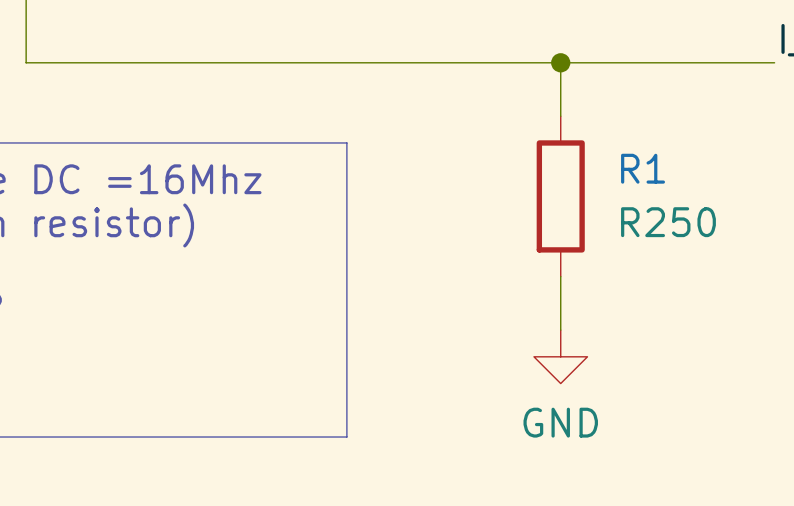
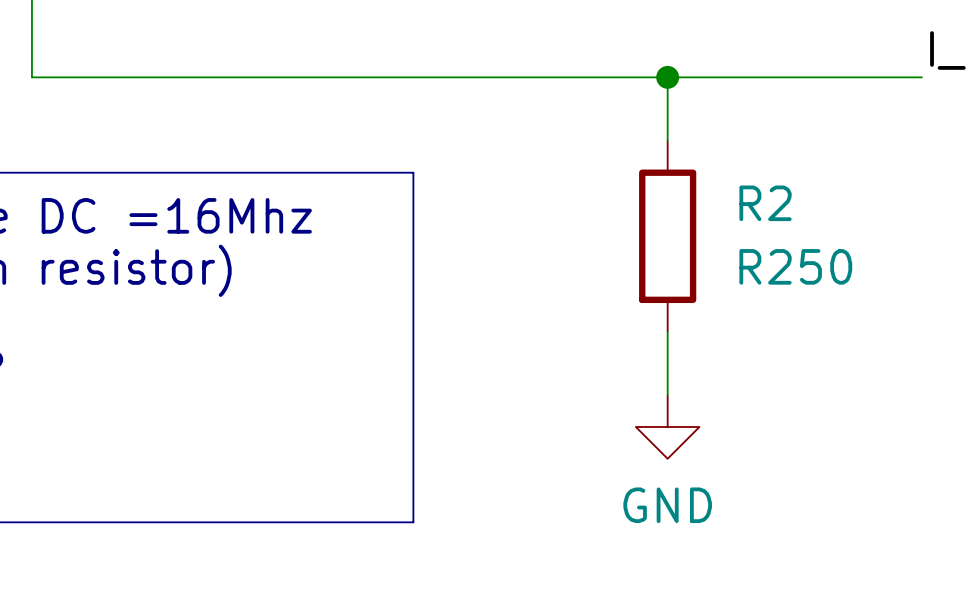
R1 name: R1 (643, 168) -> R2 (765, 203)

